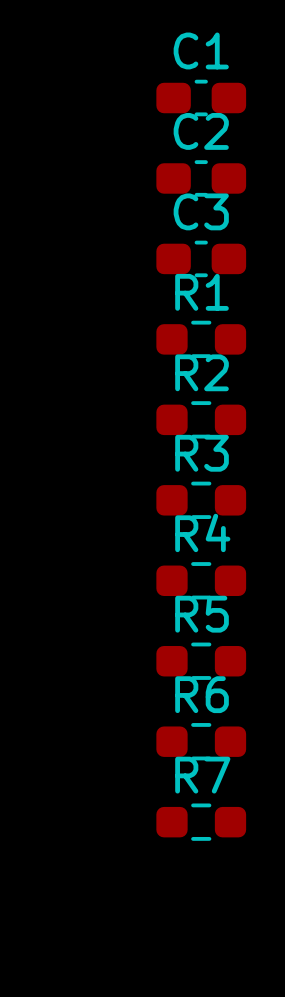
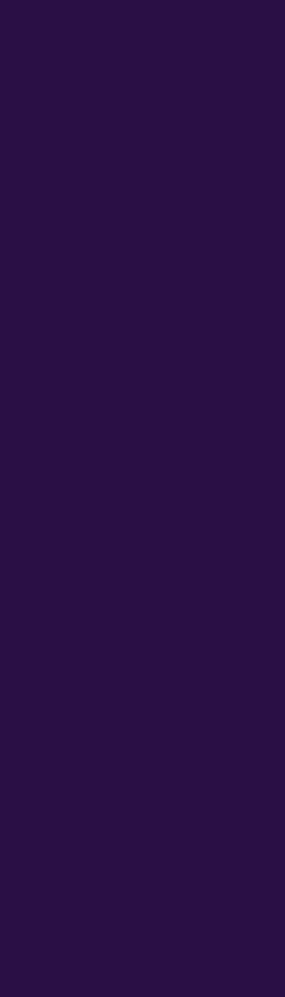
C1: (201, 98) -> none
C2: (201, 178) -> none
C3: (201, 258) -> none
R1: (201, 339) -> none
R2: (201, 419) -> none
R3: (201, 500) -> none
R4: (201, 580) -> none
R5: (201, 661) -> none
R6: (201, 741) -> none
R7: (201, 822) -> none

